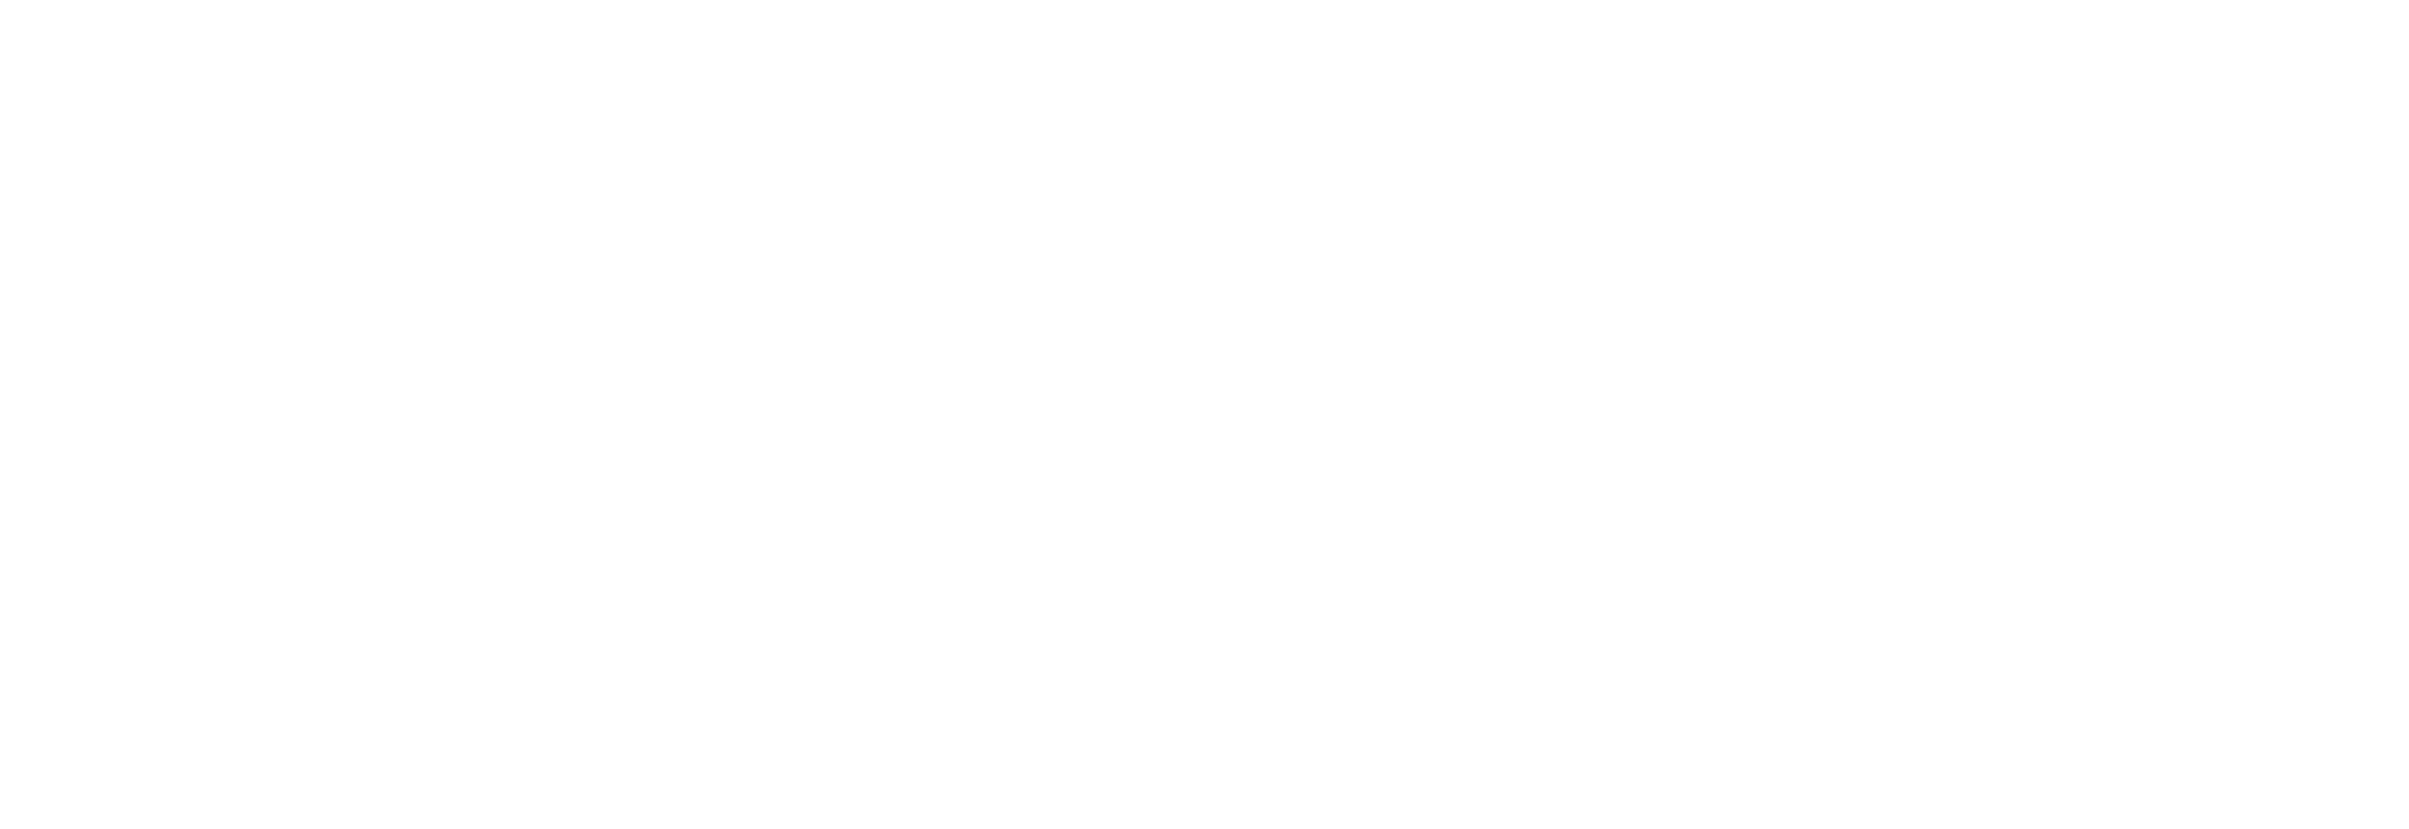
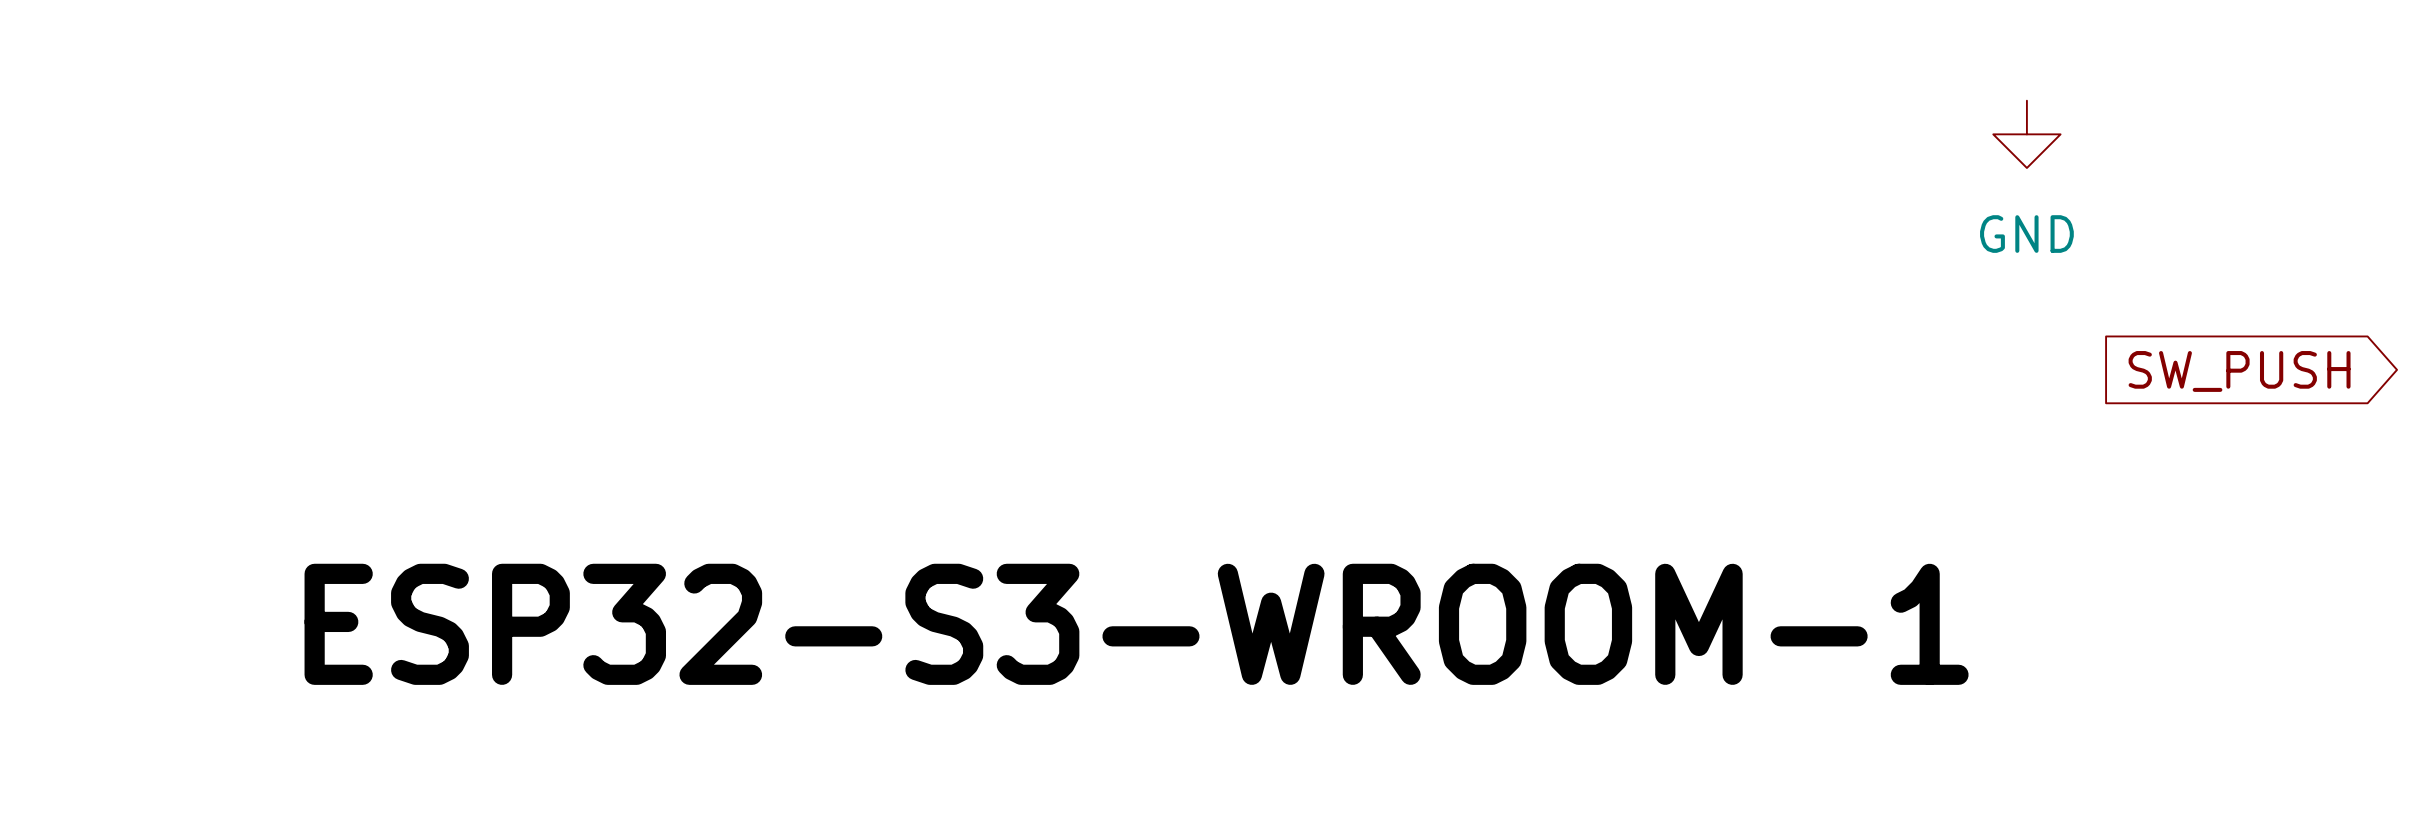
power symbol: none -> GND (2026, 134)
global label: none -> SW_PUSH (2239, 371)
label: none -> ESP32-S3-WROOM-1 (1136, 624)

